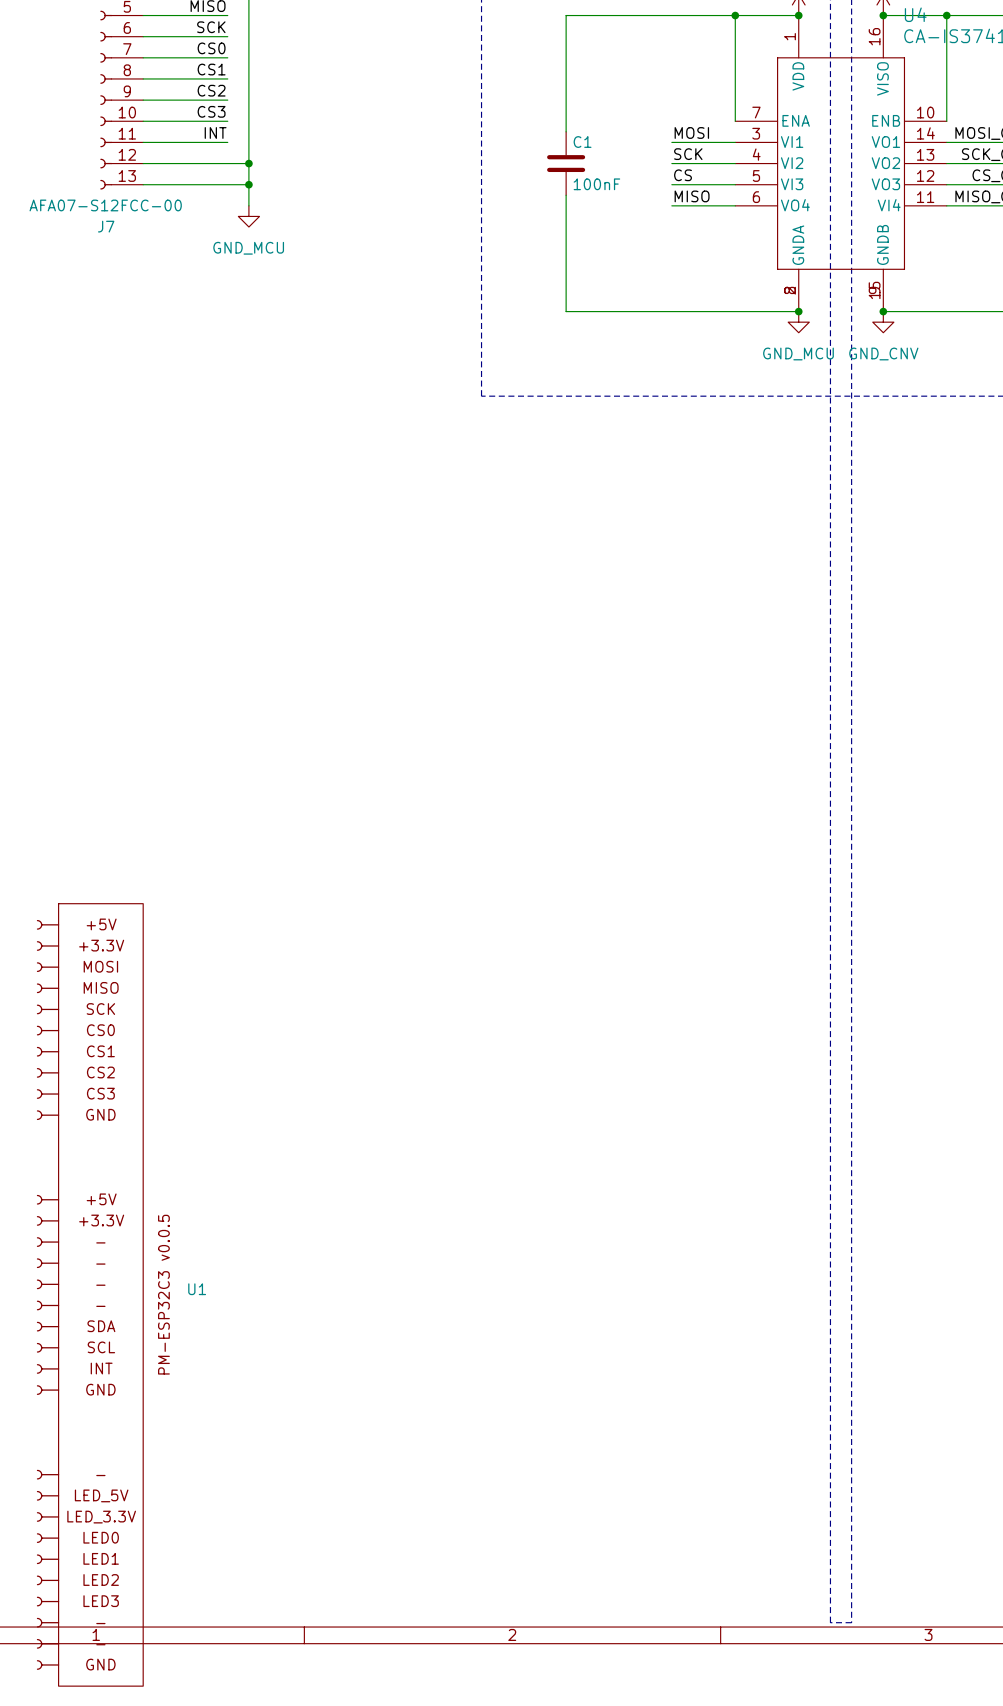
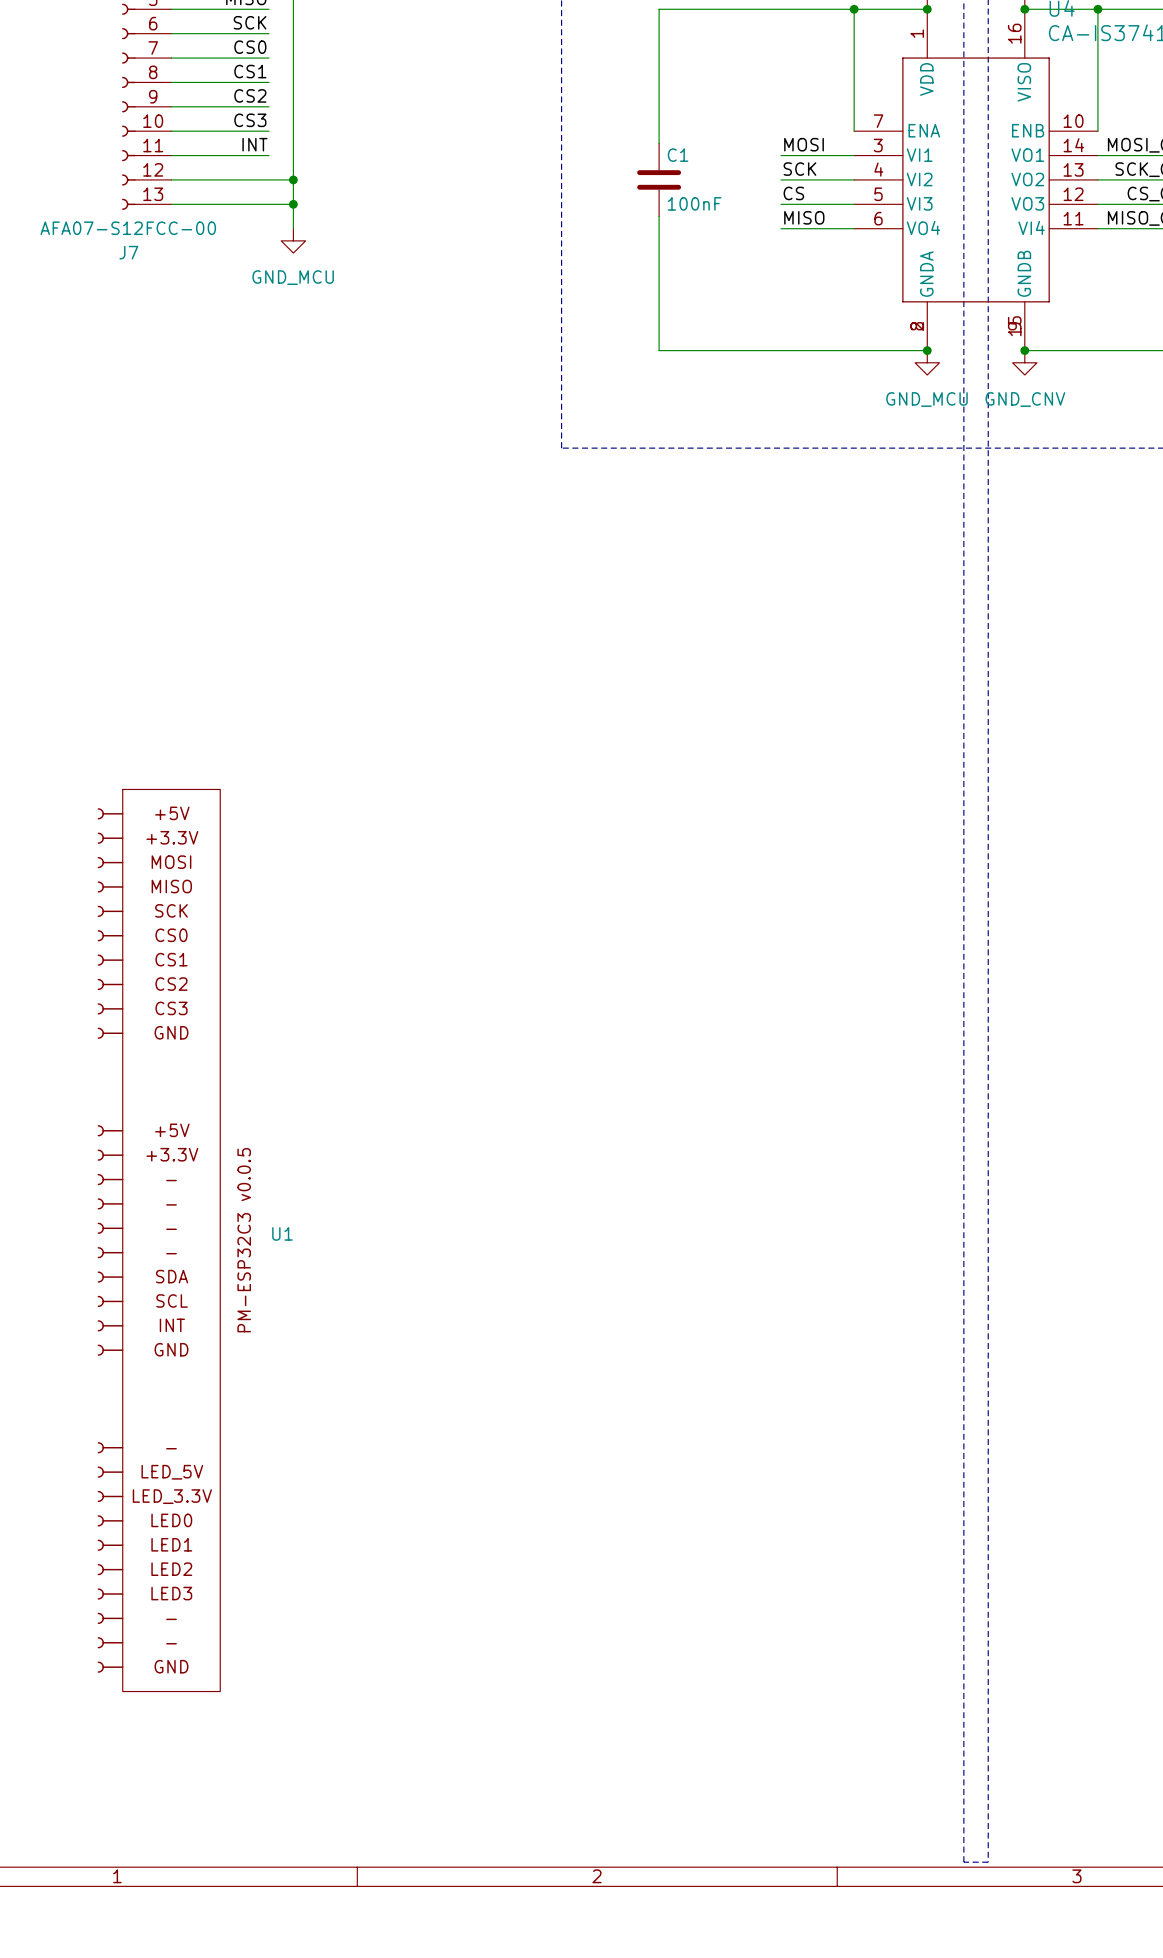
U1 position: (90, 1294) -> (158, 1240)

